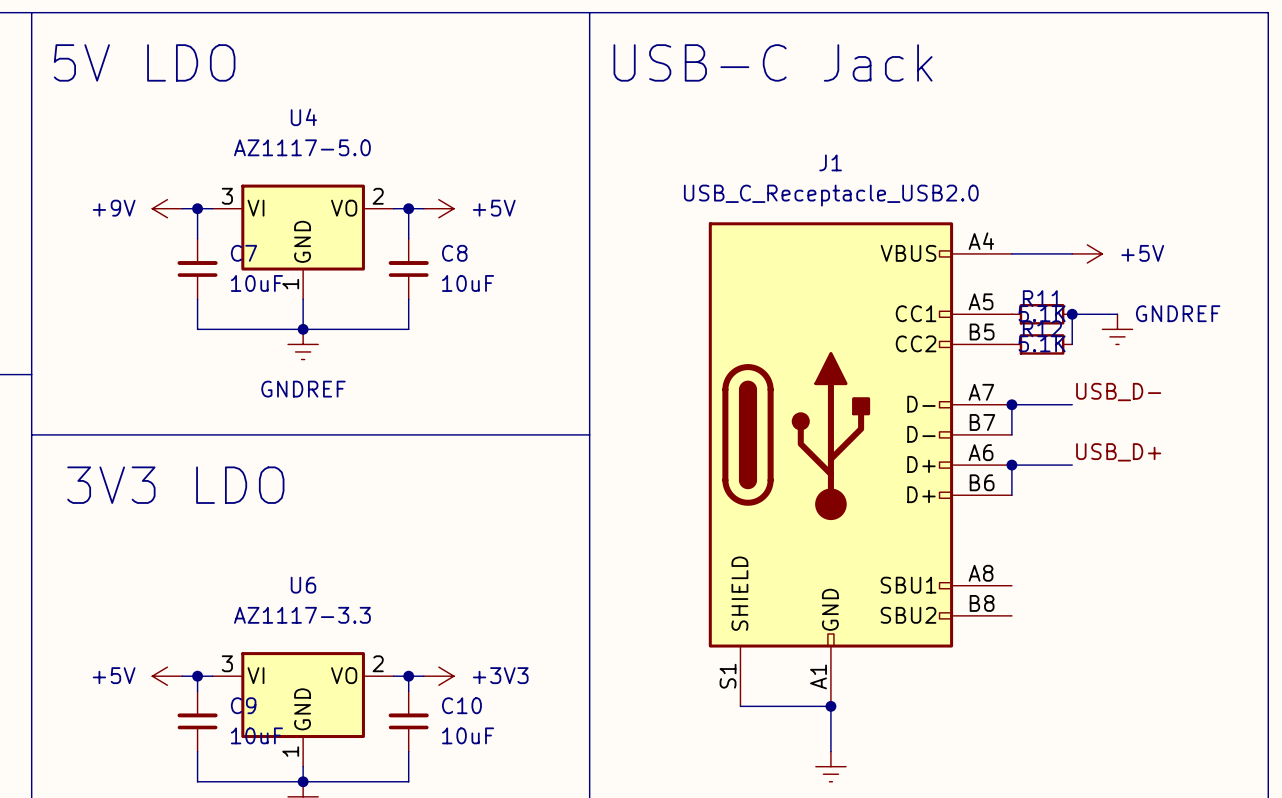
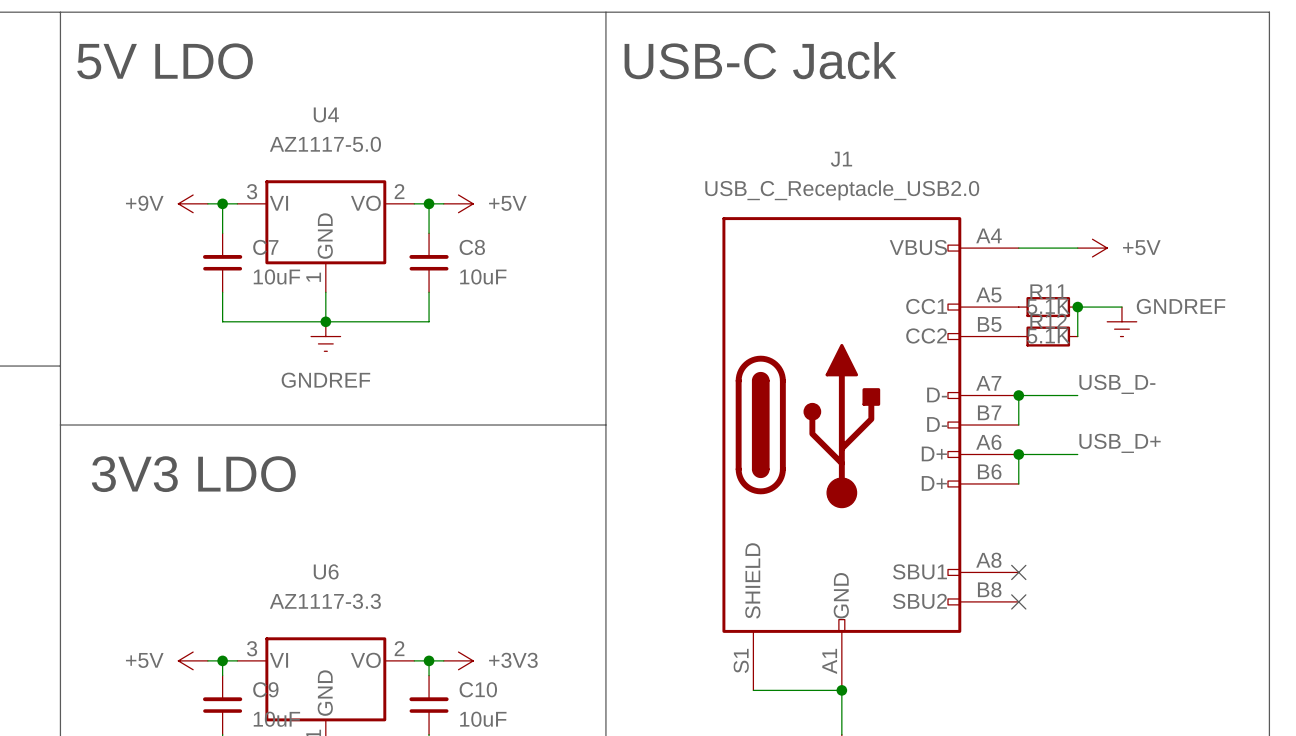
no-connect mark: none -> (1018, 572)
no-connect mark: none -> (1018, 601)

